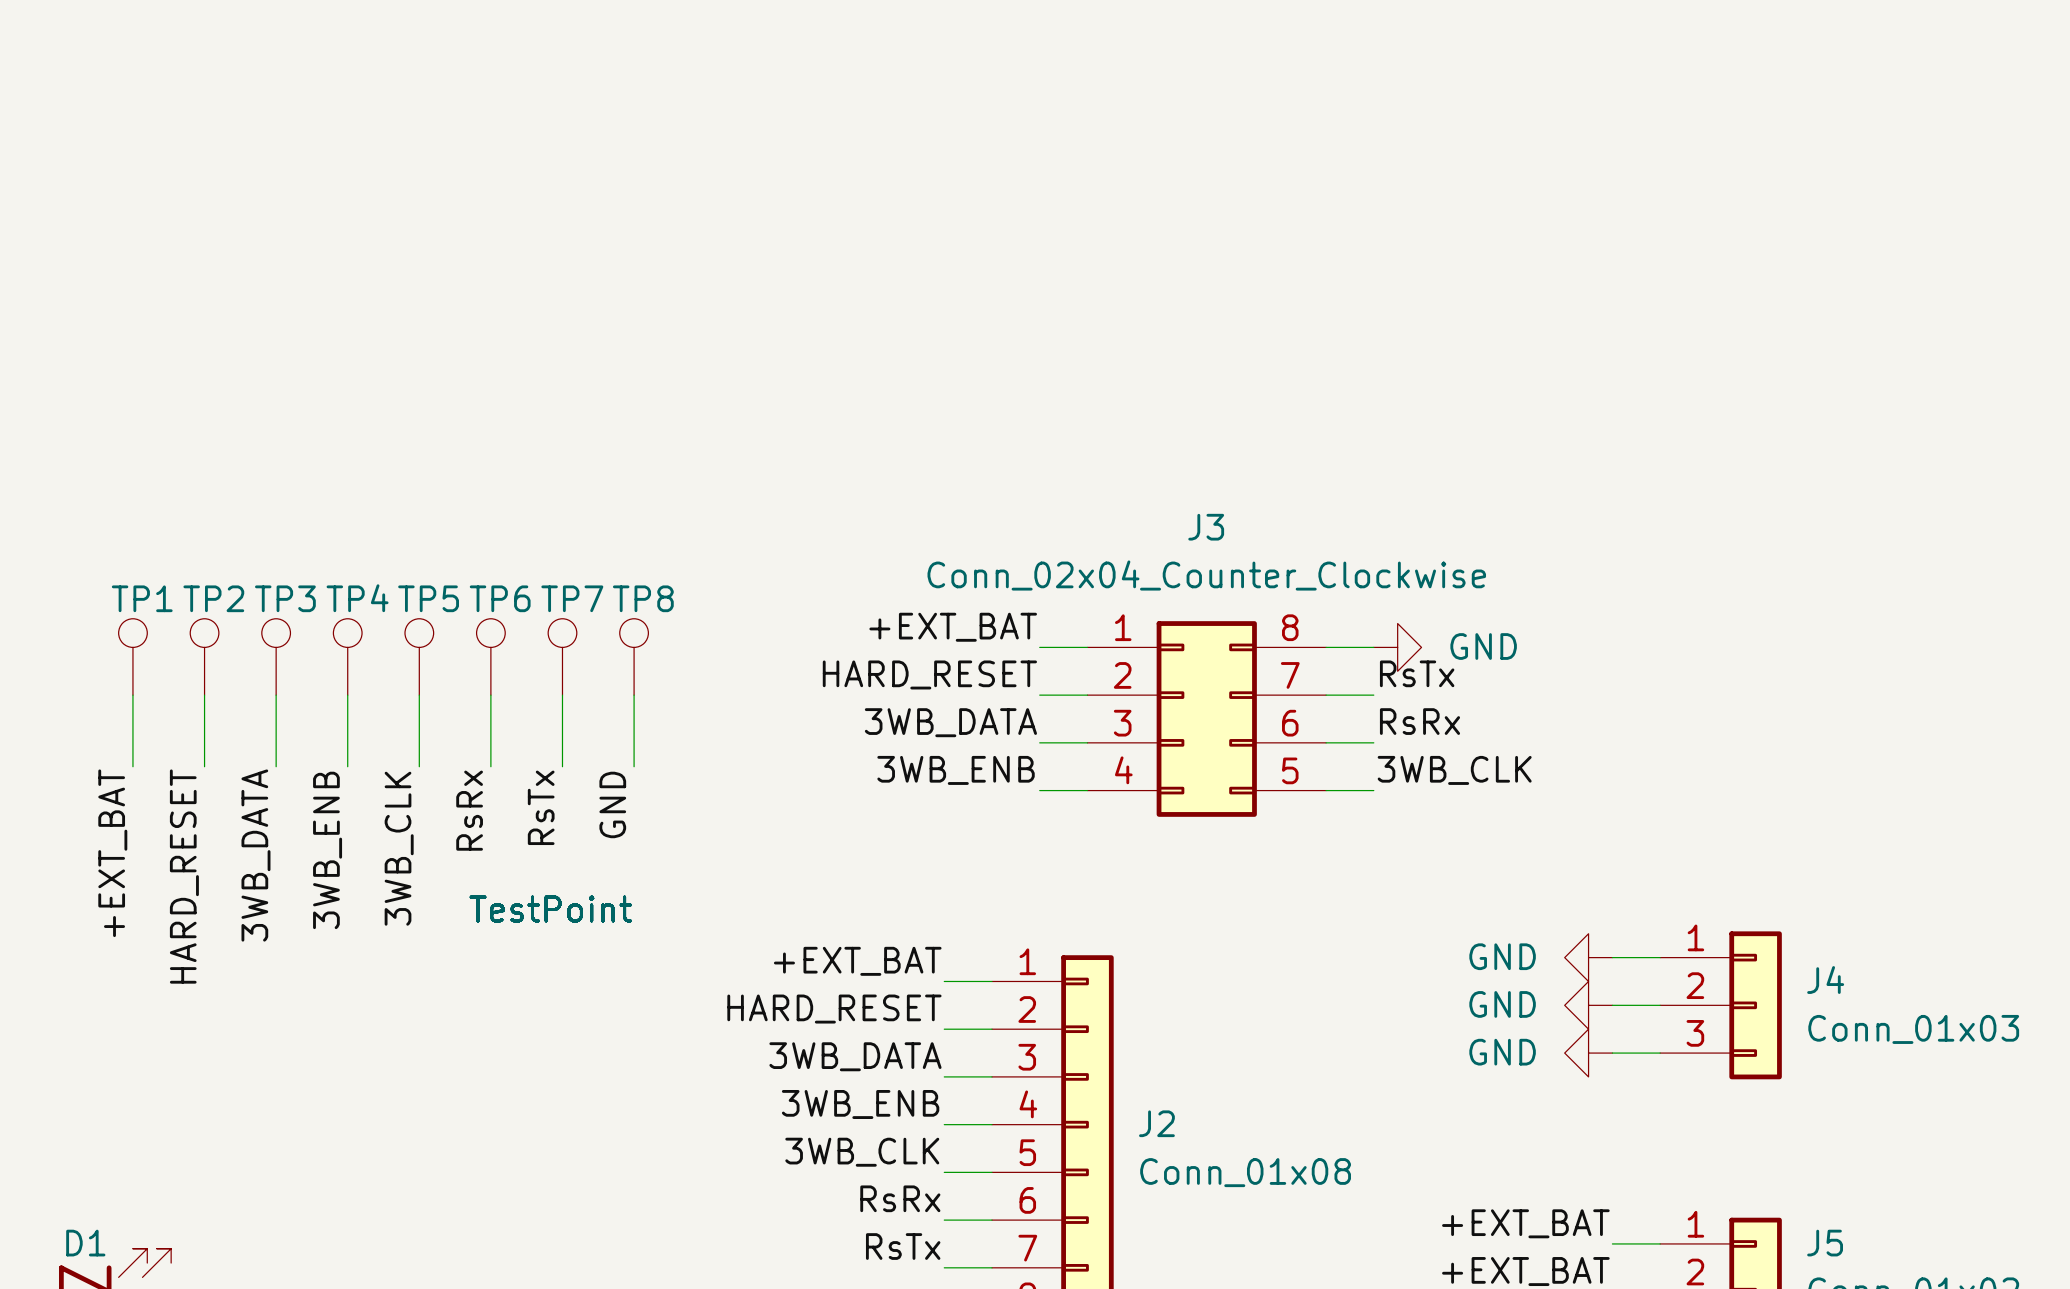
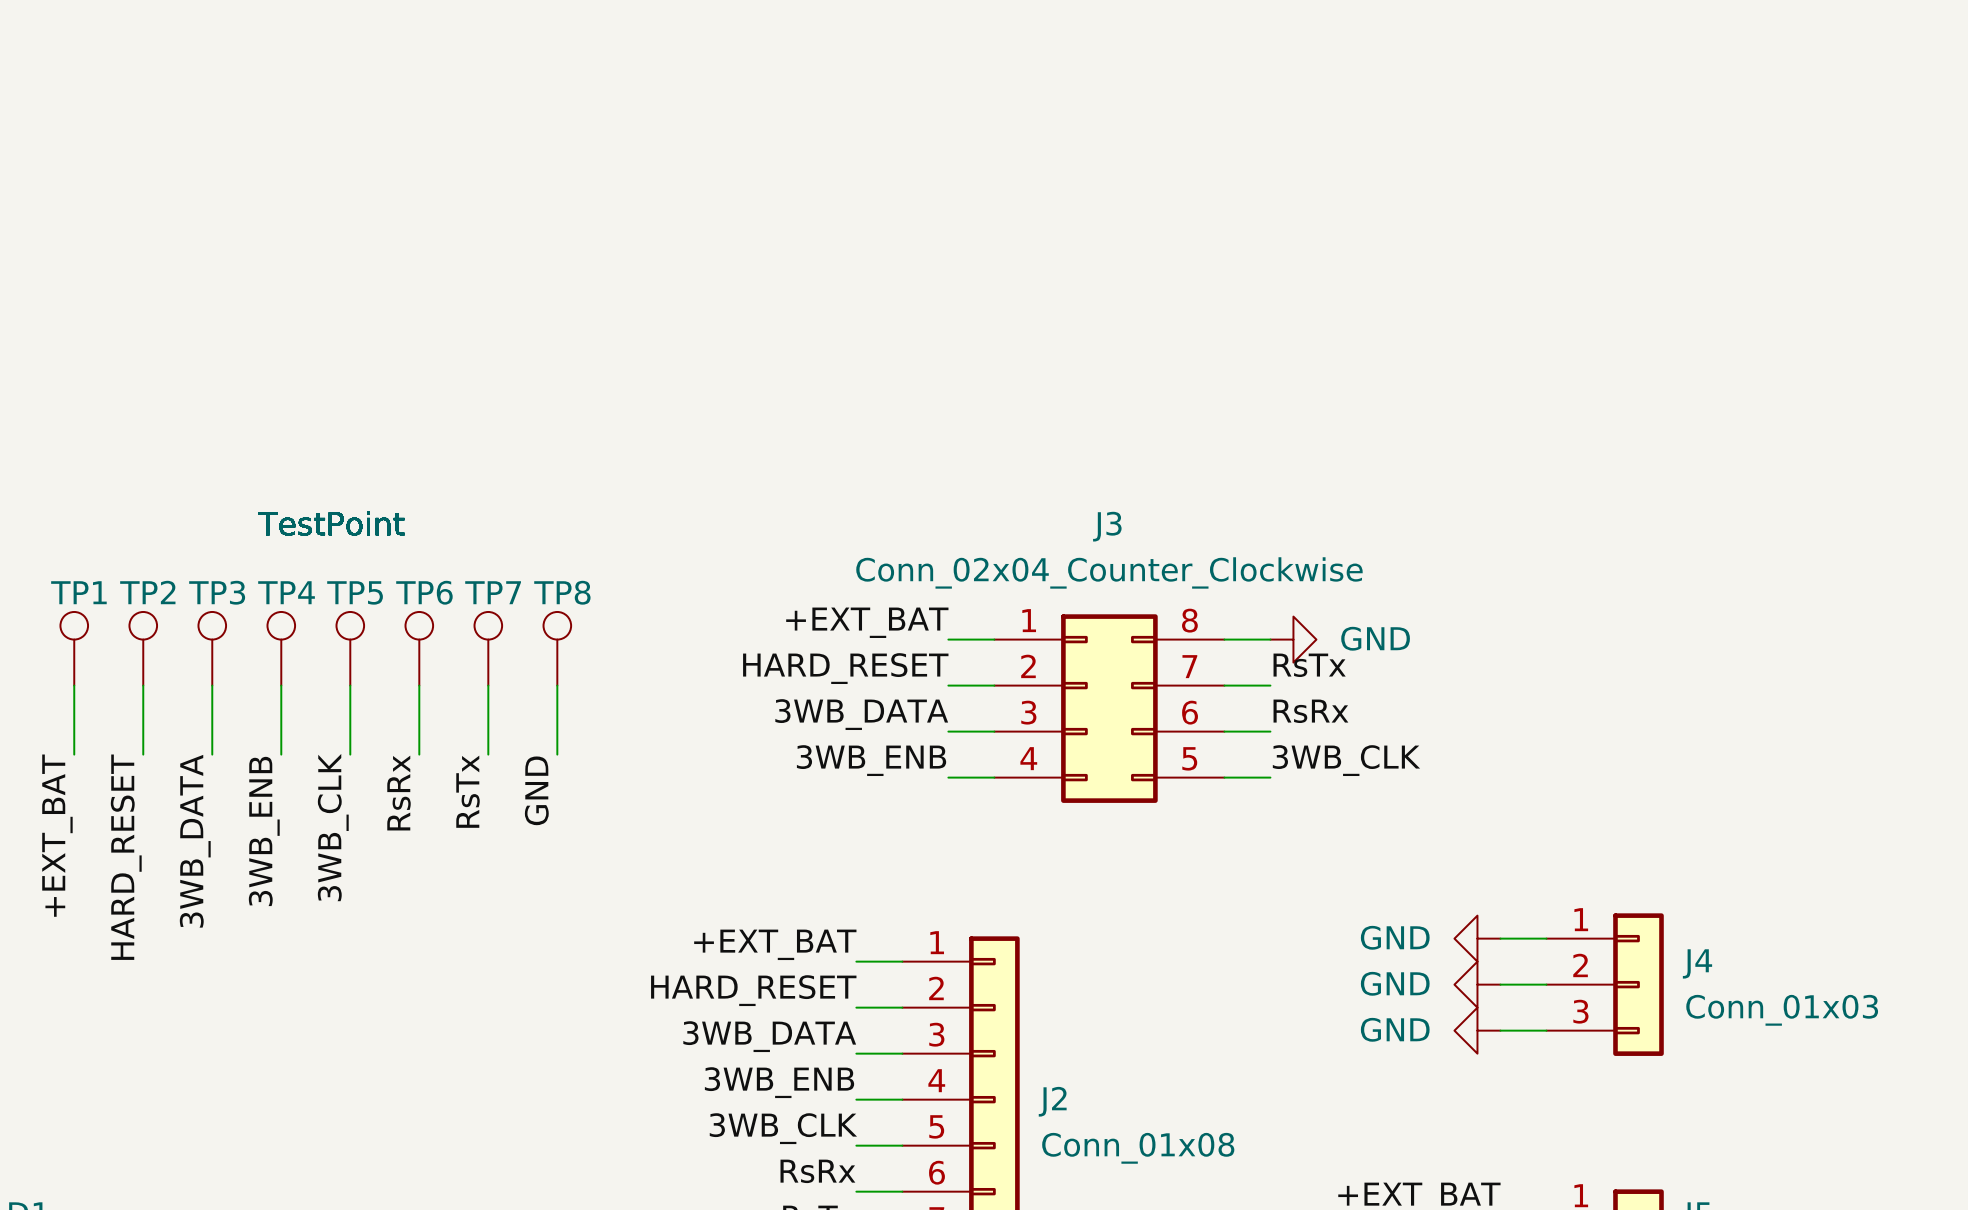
TP3 value position: TestPoint (550, 908) -> TestPoint (331, 523)
TP1 value position: TestPoint (550, 908) -> TestPoint (331, 523)
TP7 value position: TestPoint (550, 908) -> TestPoint (331, 523)
TP6 value position: TestPoint (550, 908) -> TestPoint (331, 523)
TP8 value position: TestPoint (550, 908) -> TestPoint (331, 523)
TP4 value position: TestPoint (550, 908) -> TestPoint (331, 523)
TP5 value position: TestPoint (550, 908) -> TestPoint (331, 523)
TP2 value position: TestPoint (550, 908) -> TestPoint (331, 523)

